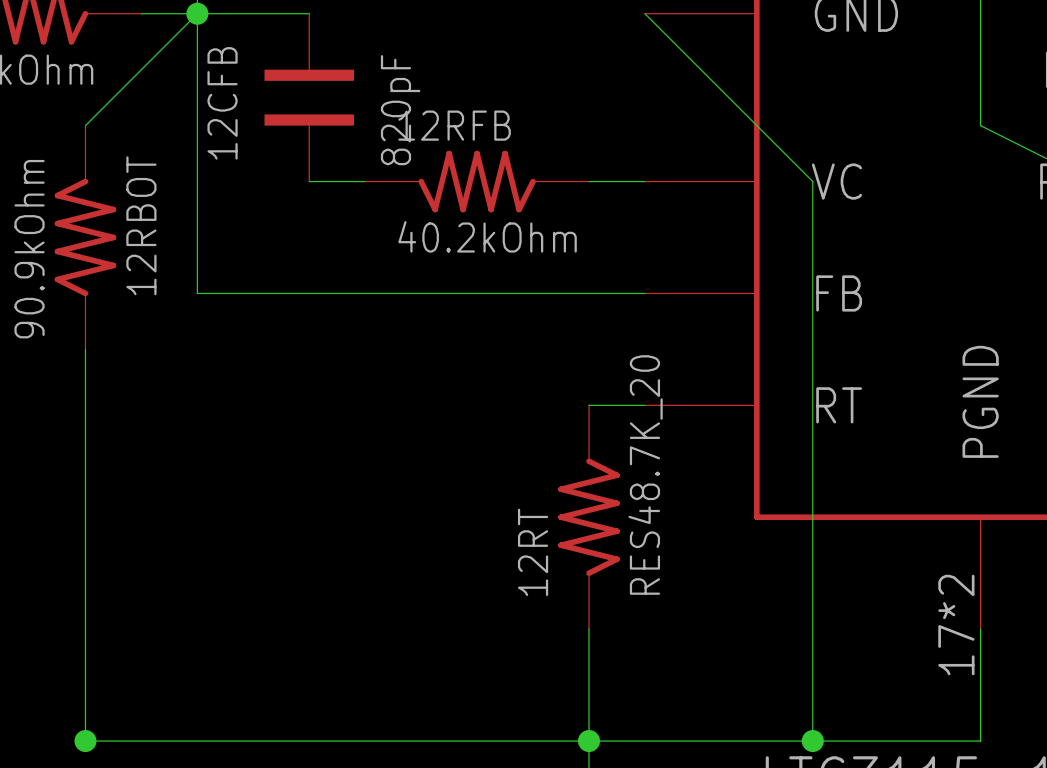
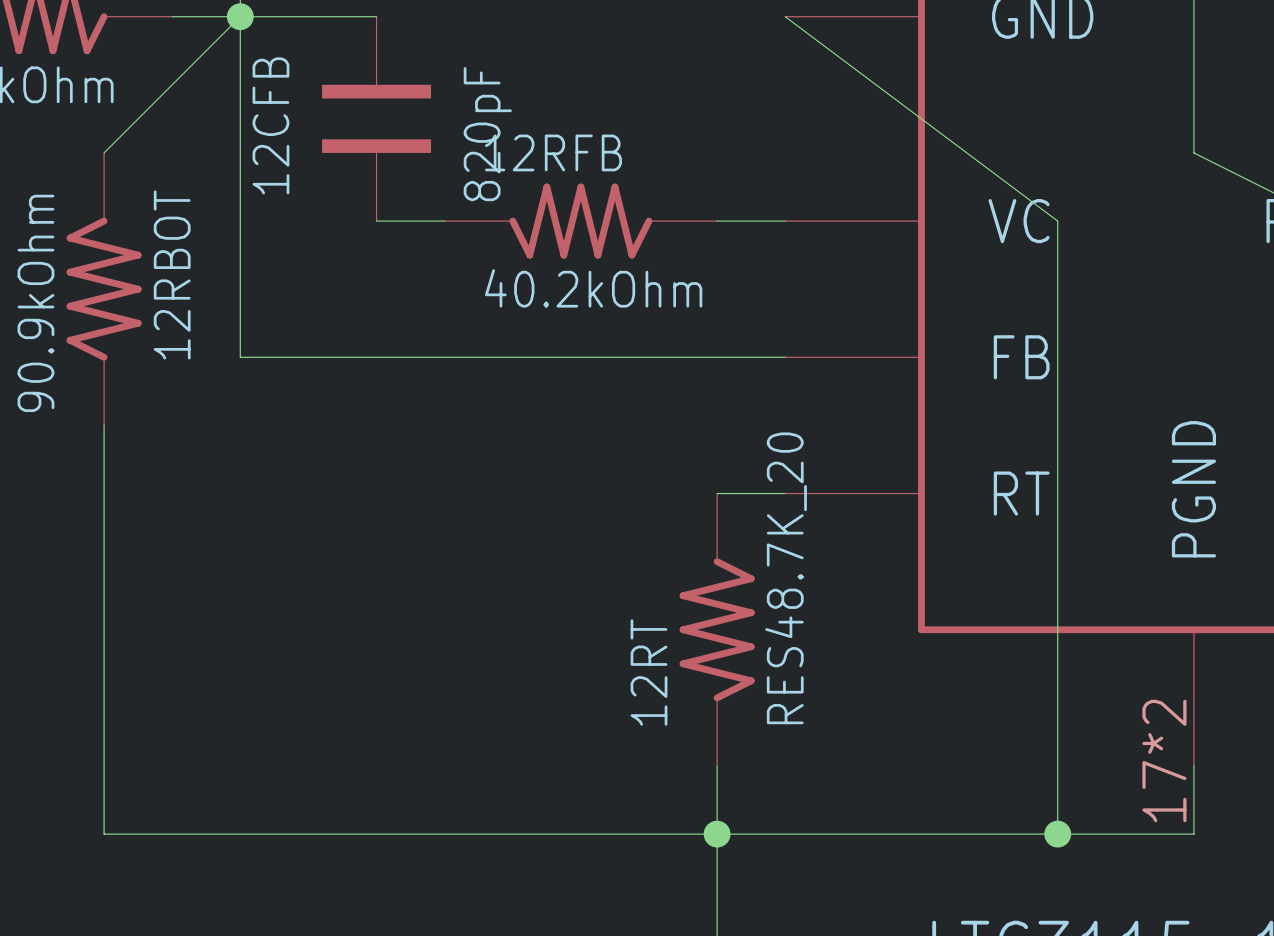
wire: (644, 13) (812, 181) (812, 741) -> (785, 16) (1057, 221) (1057, 834)
wire: (85, 685) (85, 741) (980, 741) (980, 685) -> (104, 834) (1193, 834)
junction: (85, 741) -> none
junction position: (588, 741) -> (717, 834)
junction position: (812, 741) -> (1057, 834)

